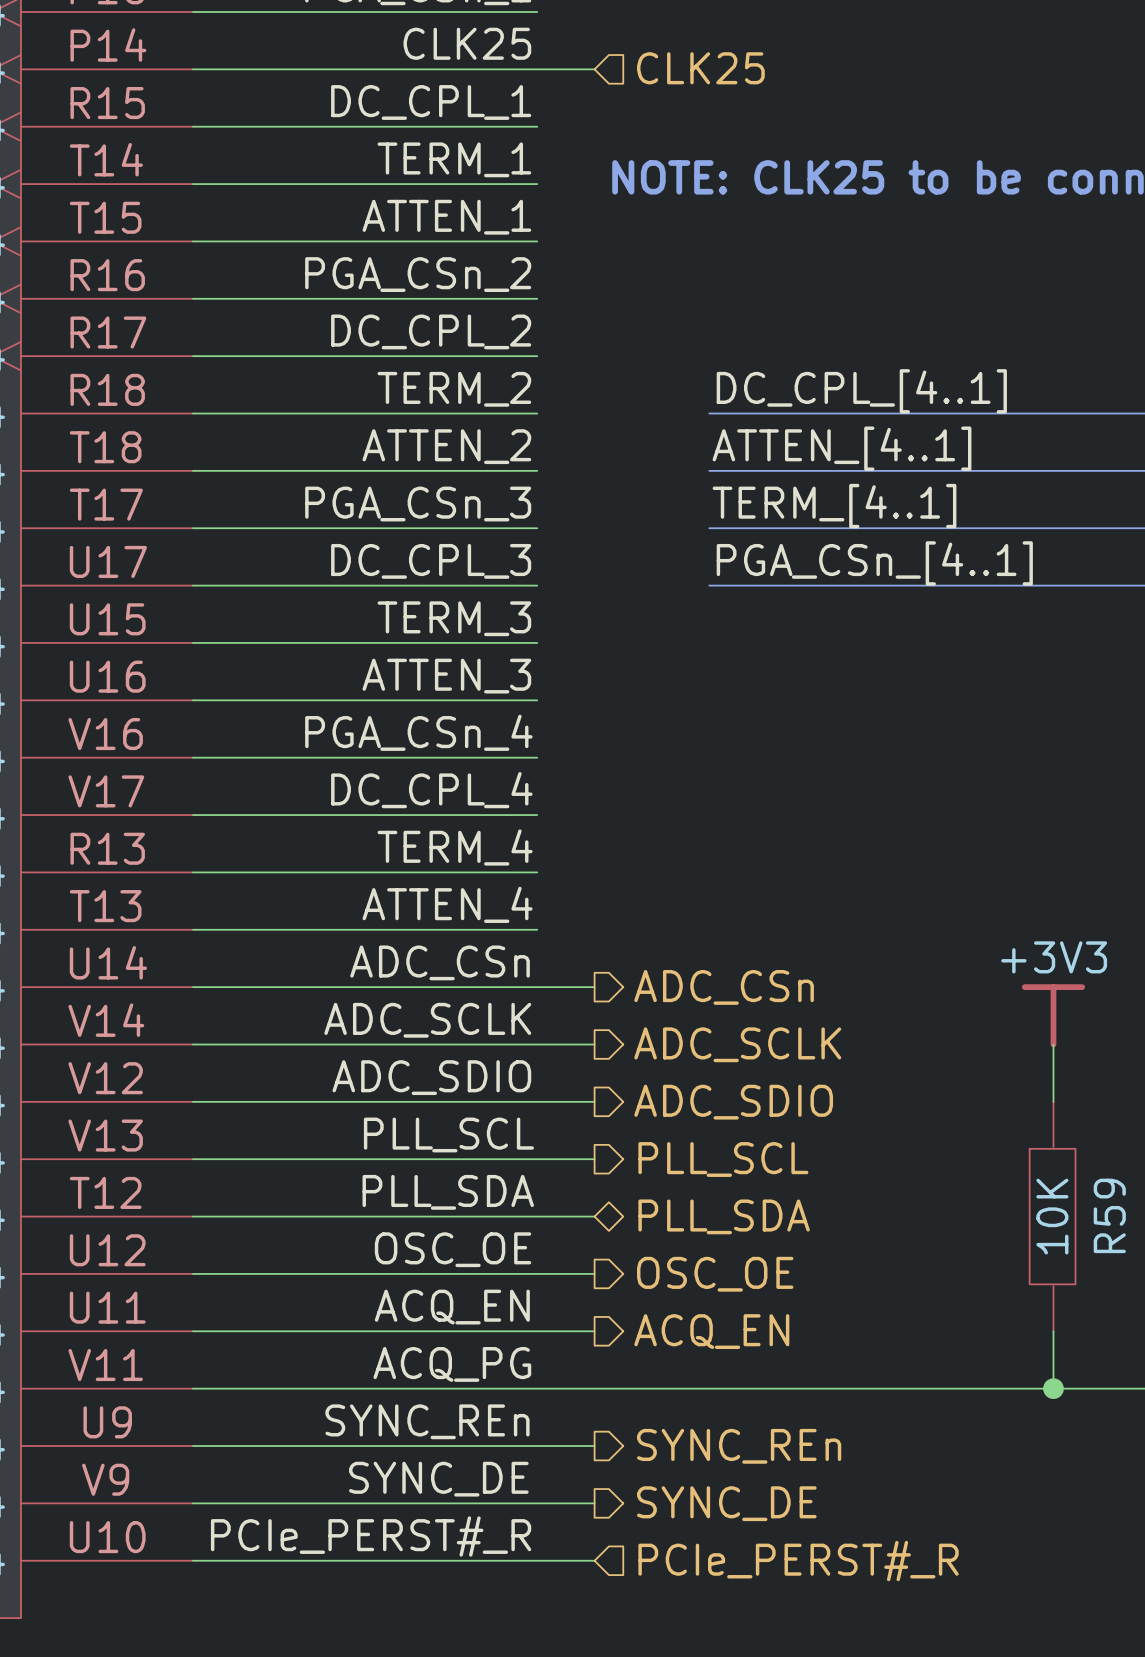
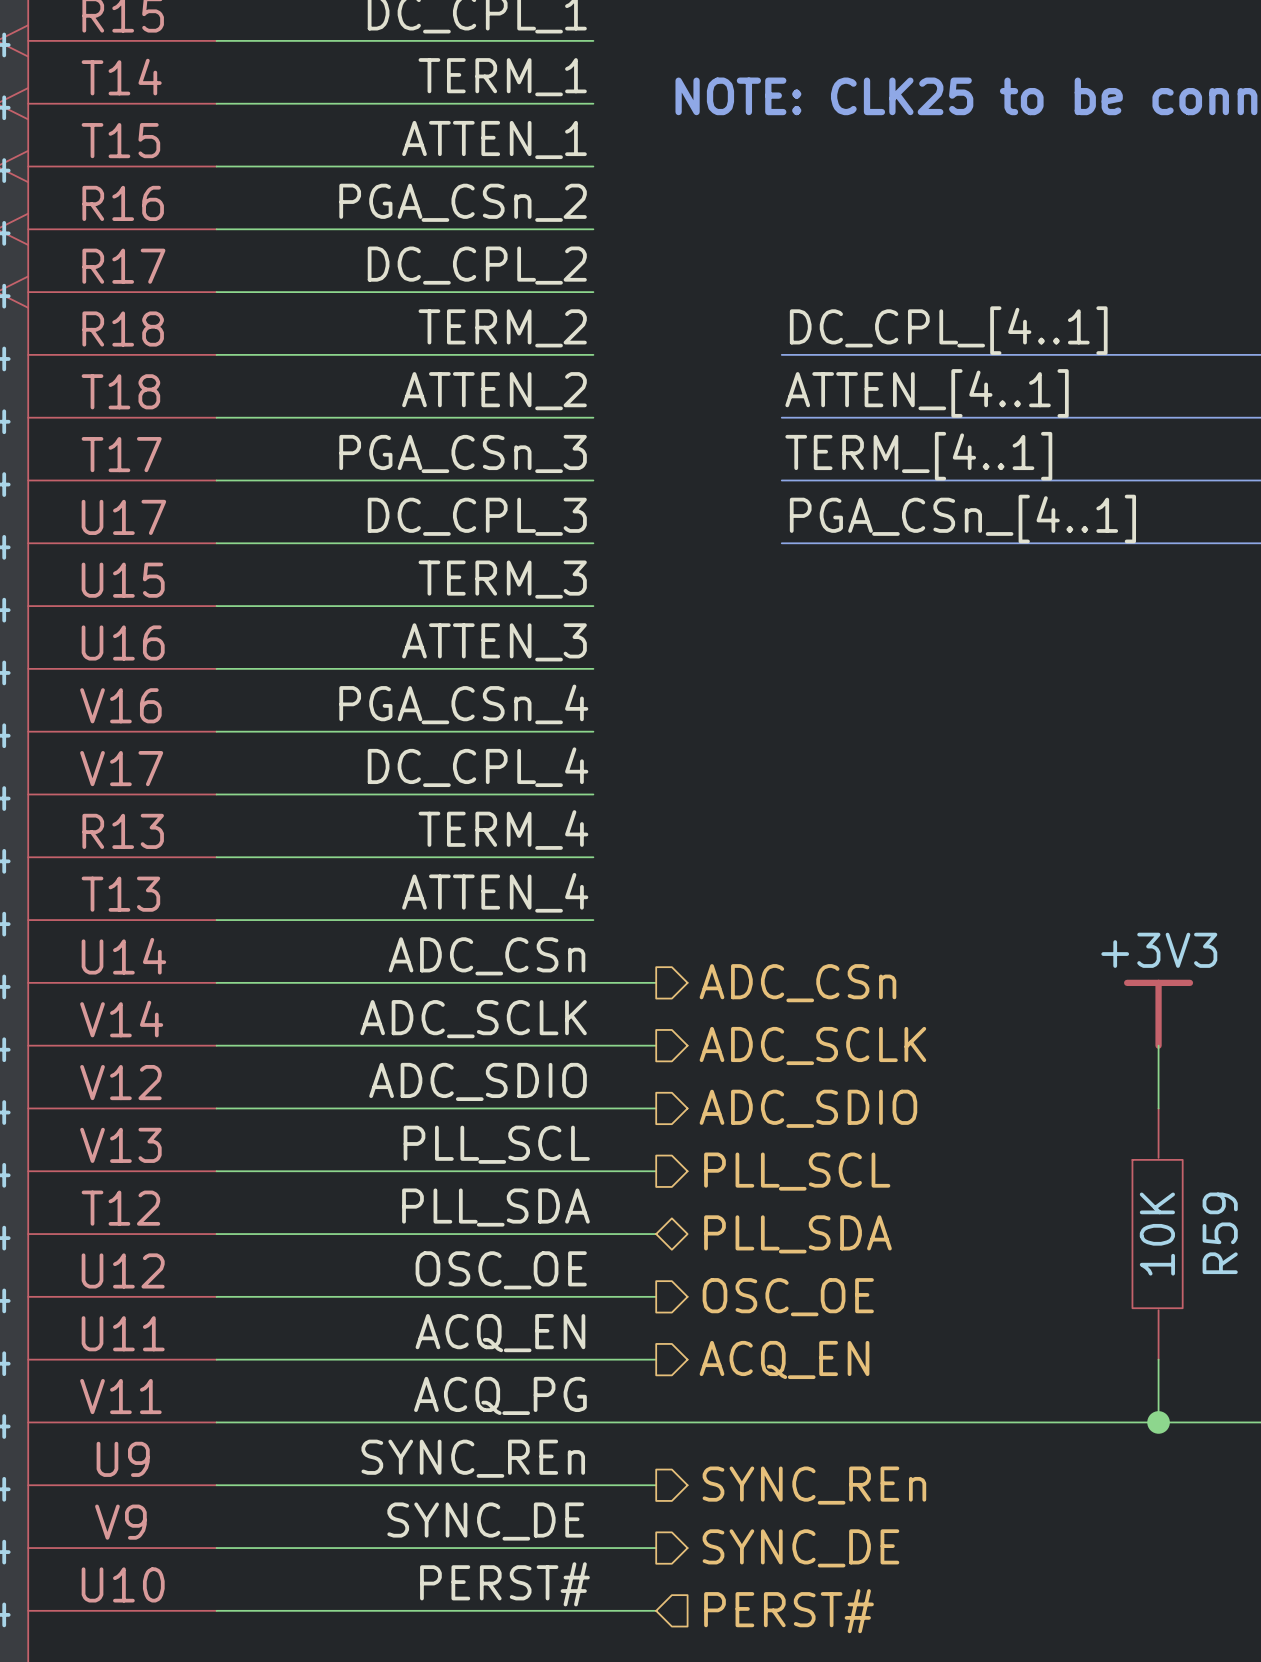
label: PCIe_PERST#_R (371, 1536) -> PERST# (504, 1584)
hierarchical label: PCIe_PERST#_R (798, 1561) -> PERST# (789, 1611)

